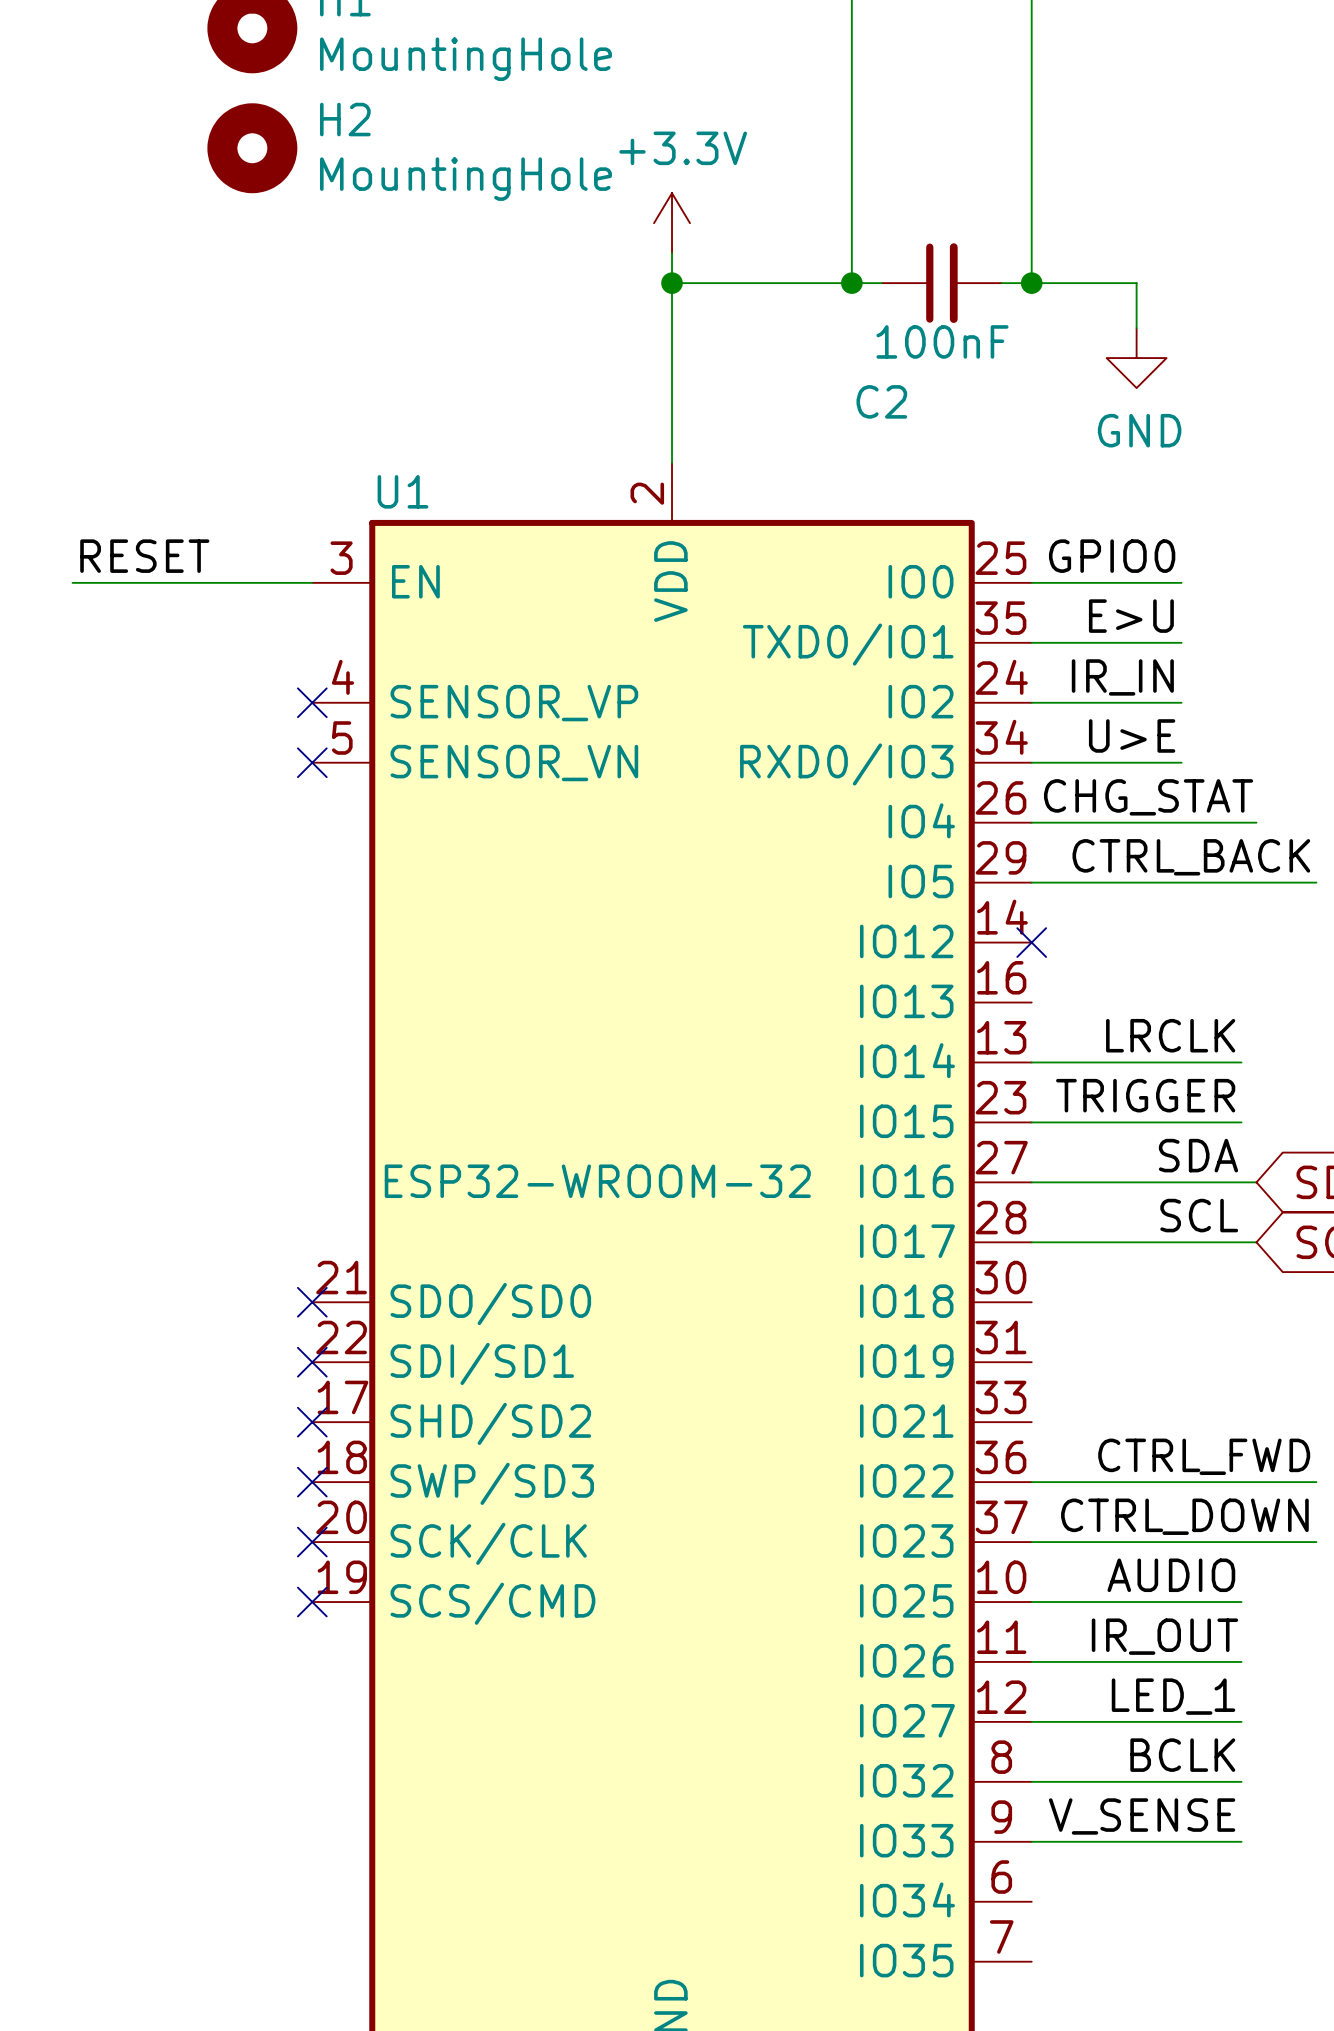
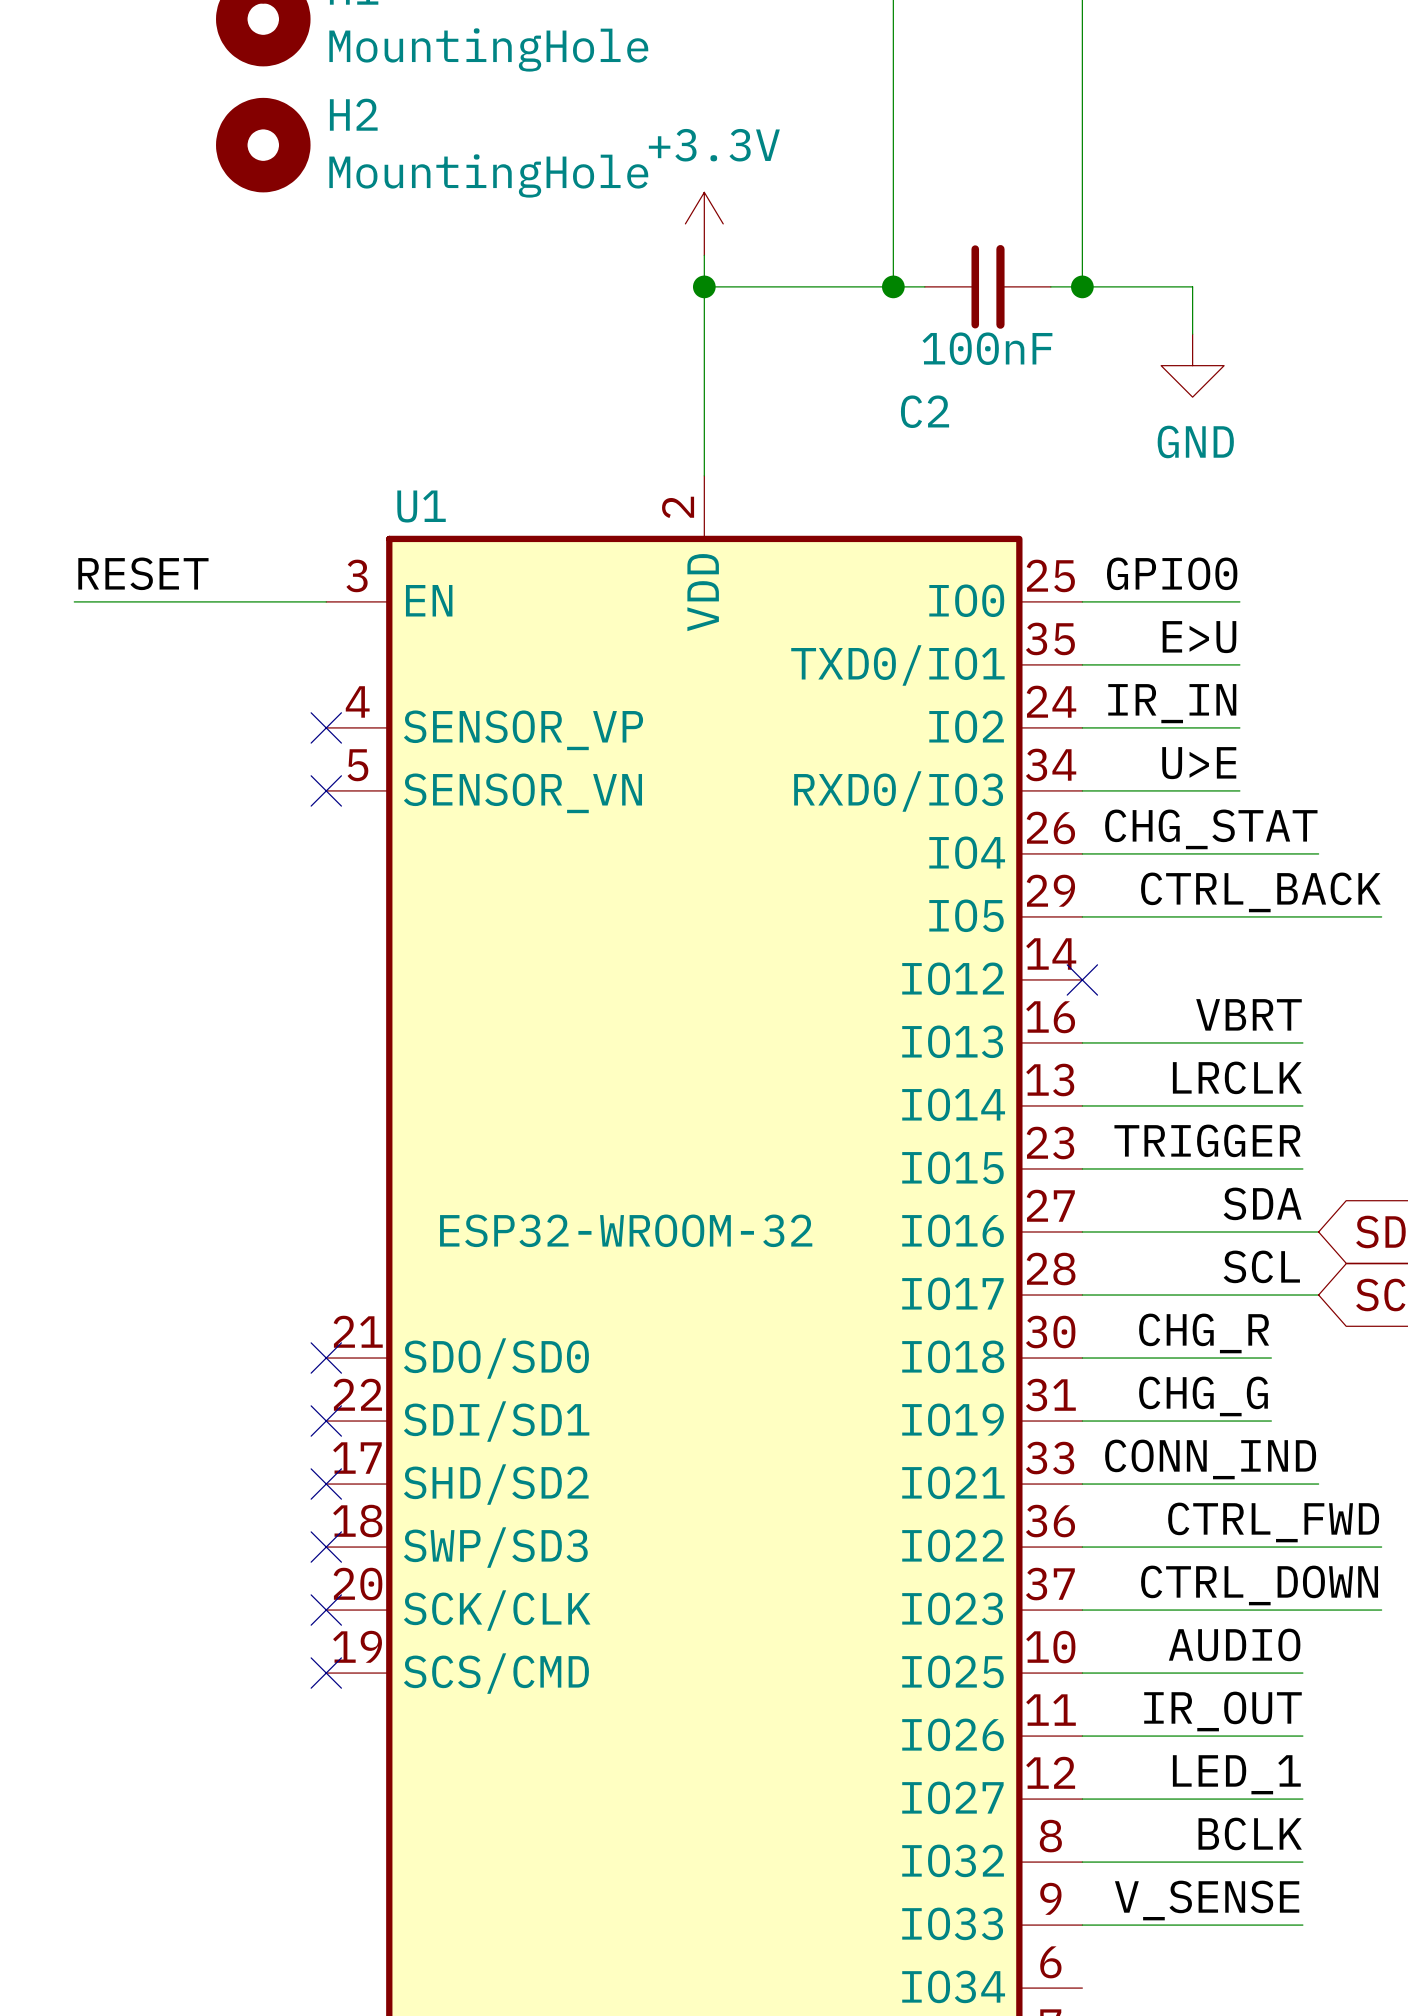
label: none -> VBRT (1248, 1014)
wire: none -> (1082, 1042) (1302, 1042)
label: none -> CHG_R (1204, 1333)
wire: none -> (1082, 1358) (1271, 1358)
label: none -> CHG_G (1203, 1396)
wire: none -> (1082, 1421) (1271, 1421)
label: none -> CONN_IND (1210, 1459)
wire: none -> (1082, 1484) (1318, 1484)

